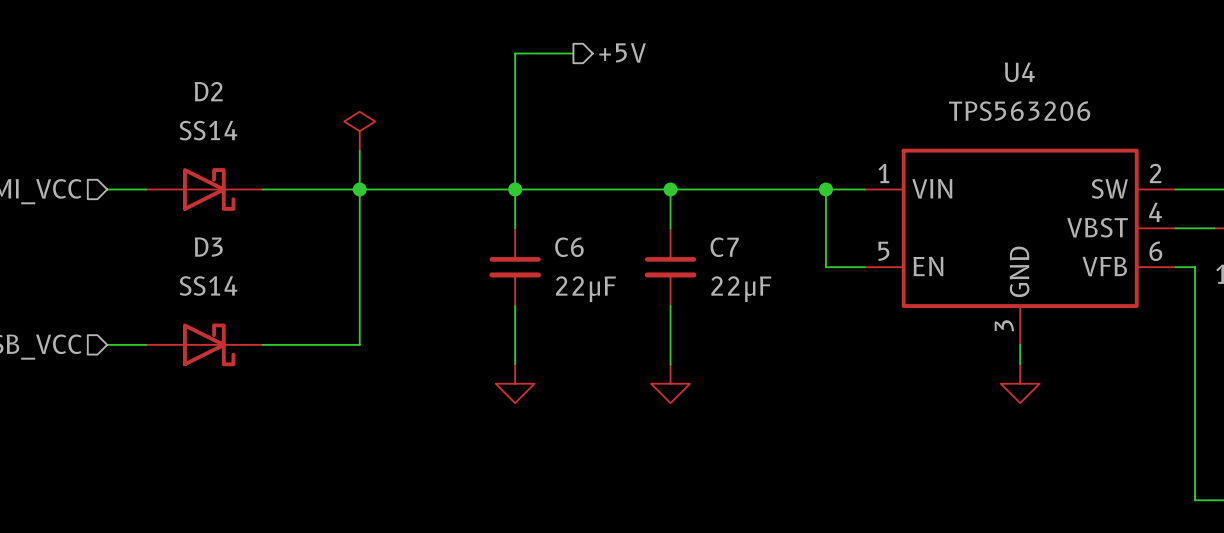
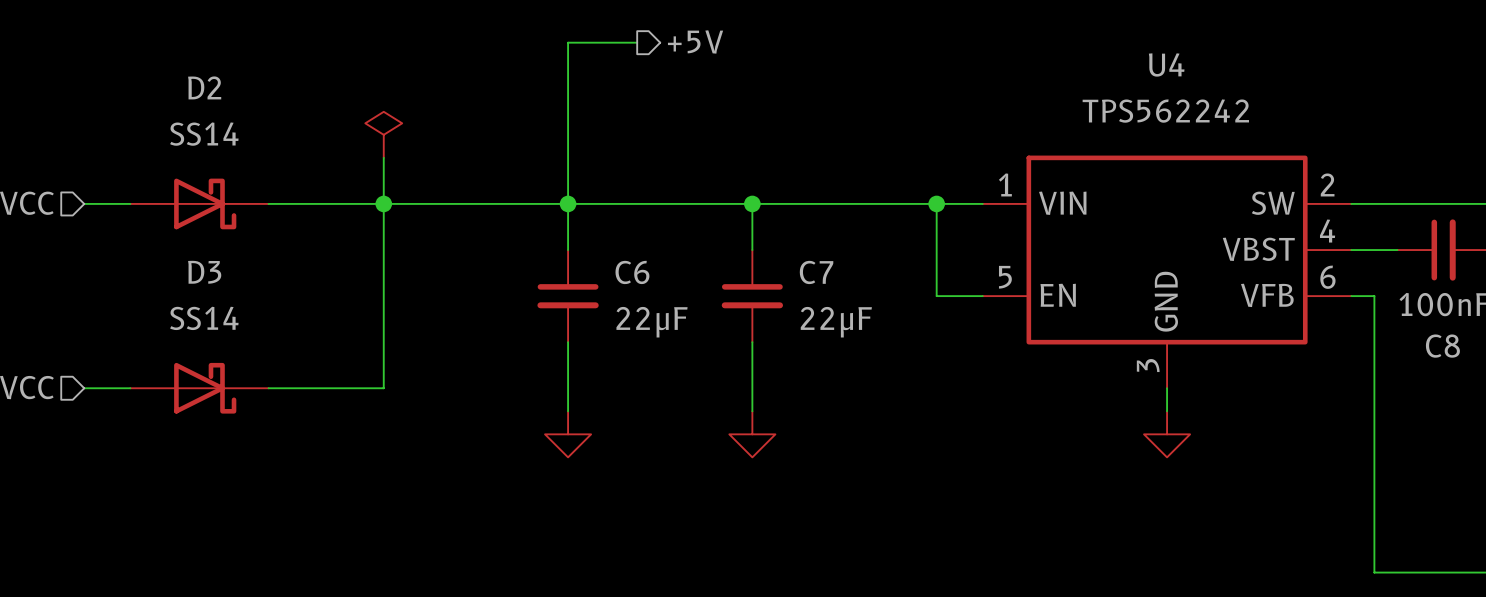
U4 value: TPS563206 (1019, 111) -> TPS562242 (1165, 111)

